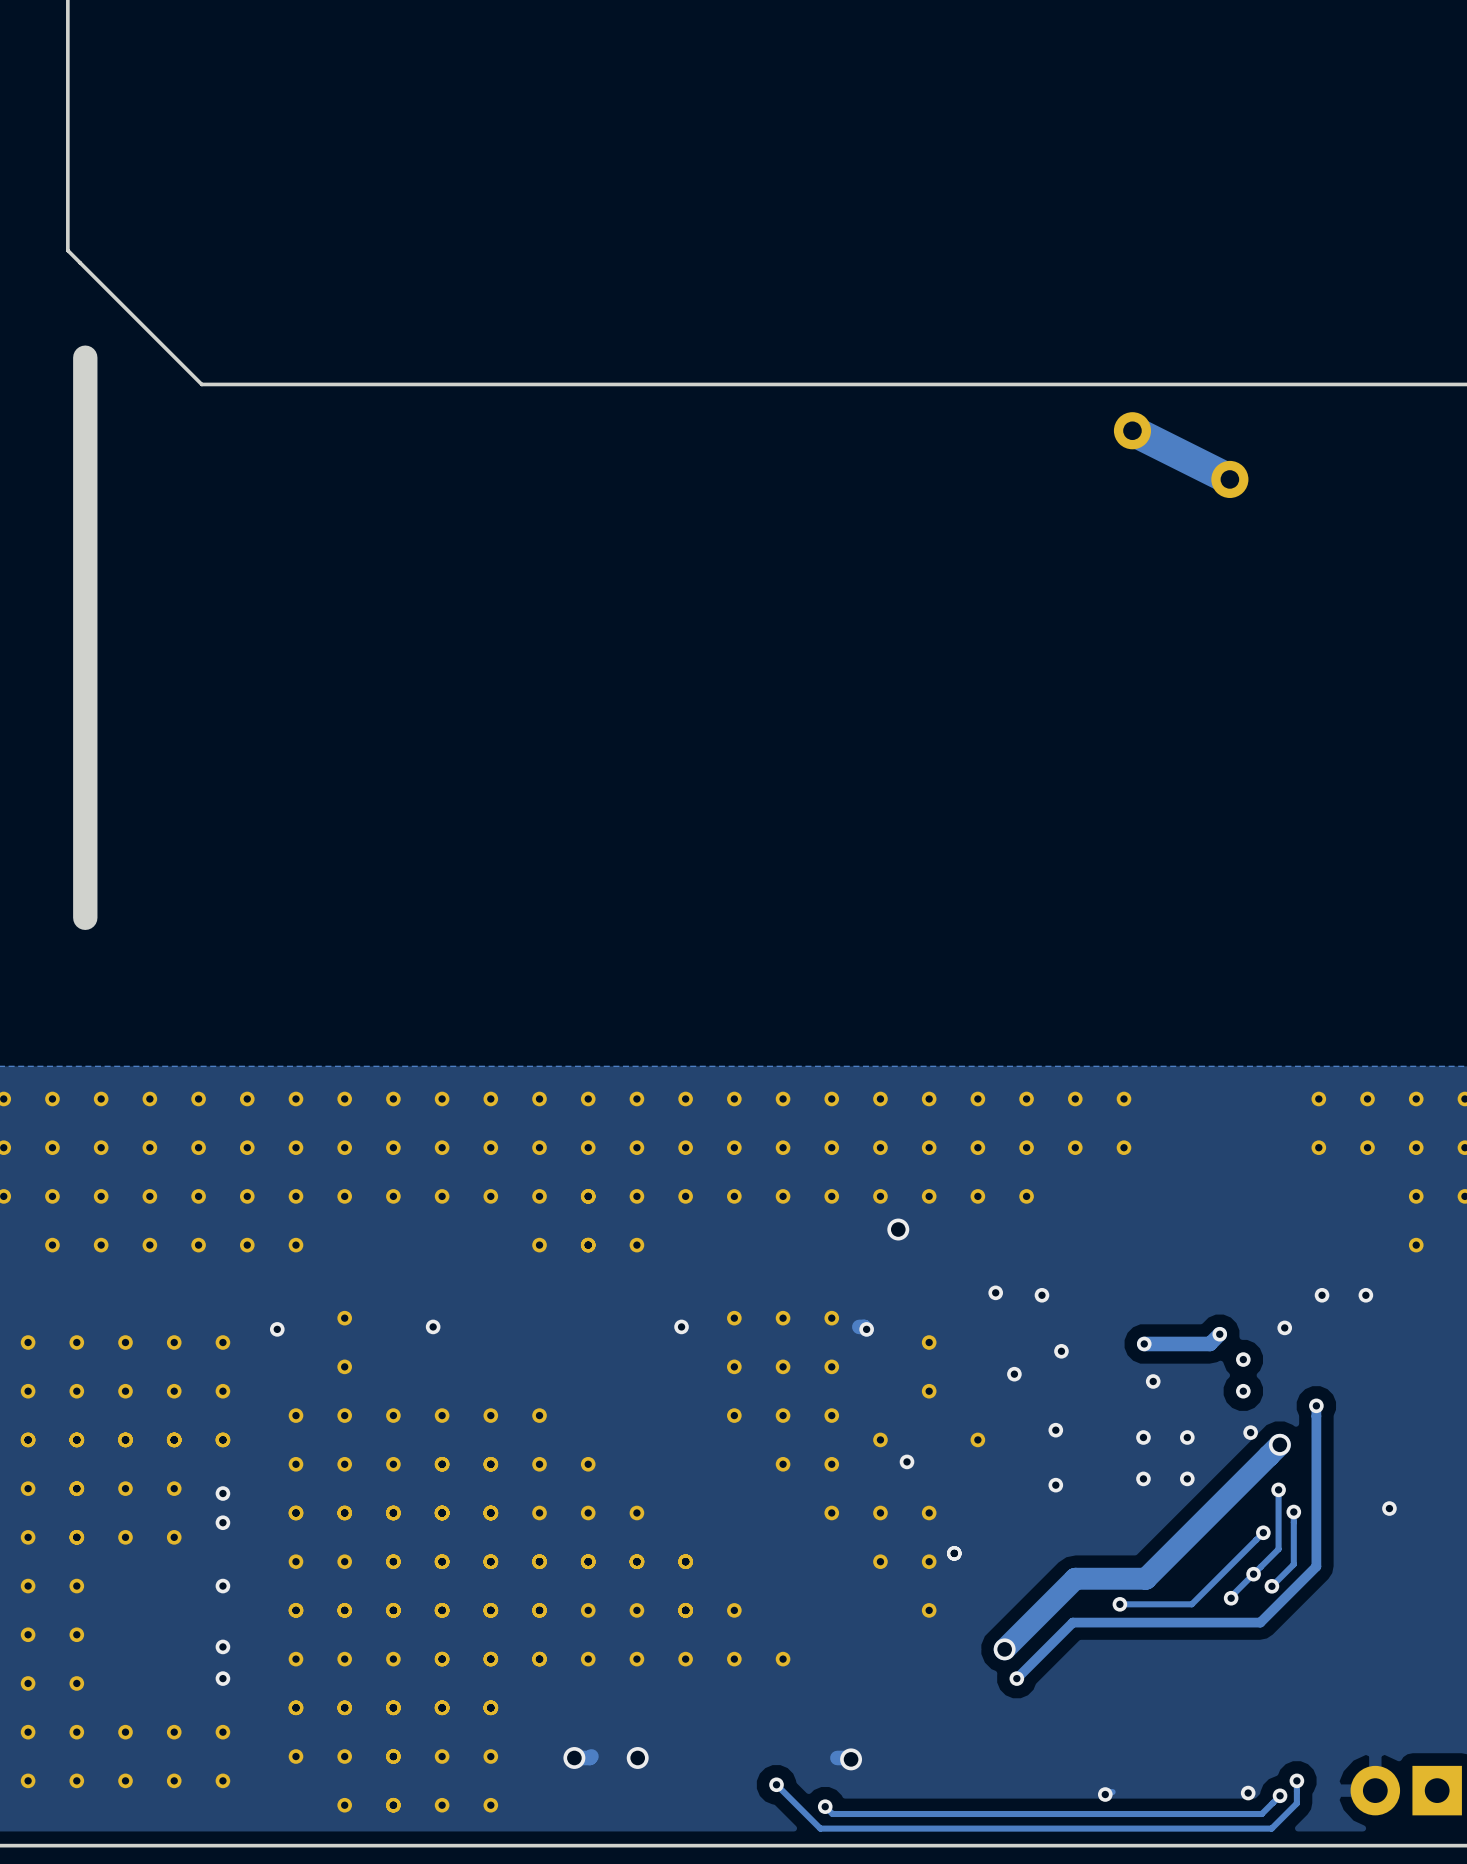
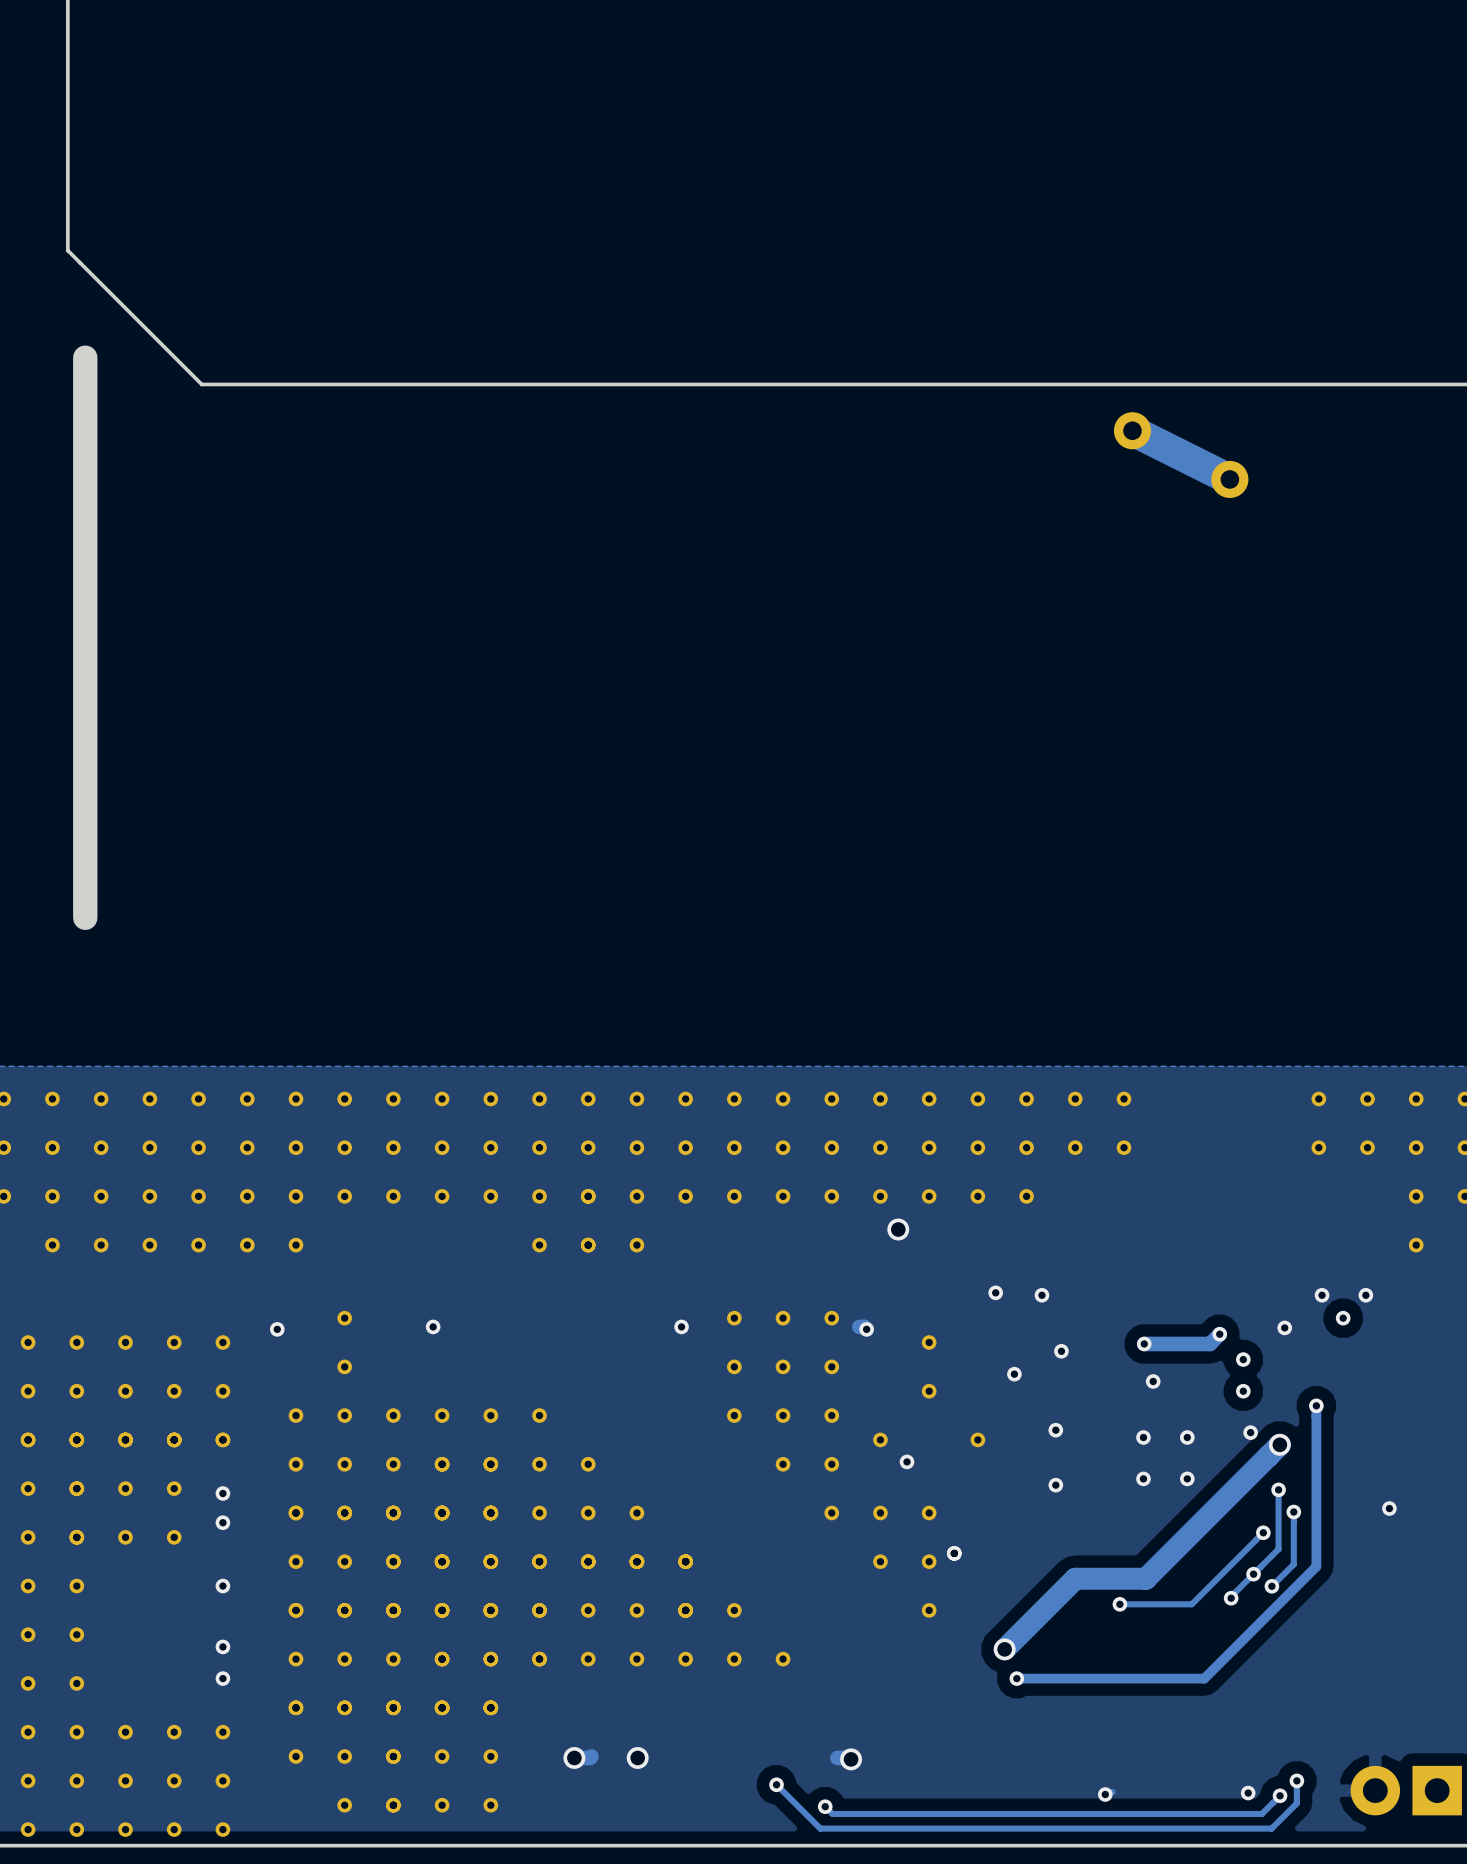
via: none -> (1343, 1318)
track: (1260, 1622) (1072, 1622) (1016, 1678) -> (1260, 1622) (1204, 1678) (1016, 1678)
part: none -> (28, 1829)
part: none -> (76, 1829)
part: none -> (125, 1829)
part: none -> (174, 1829)
part: none -> (222, 1829)

